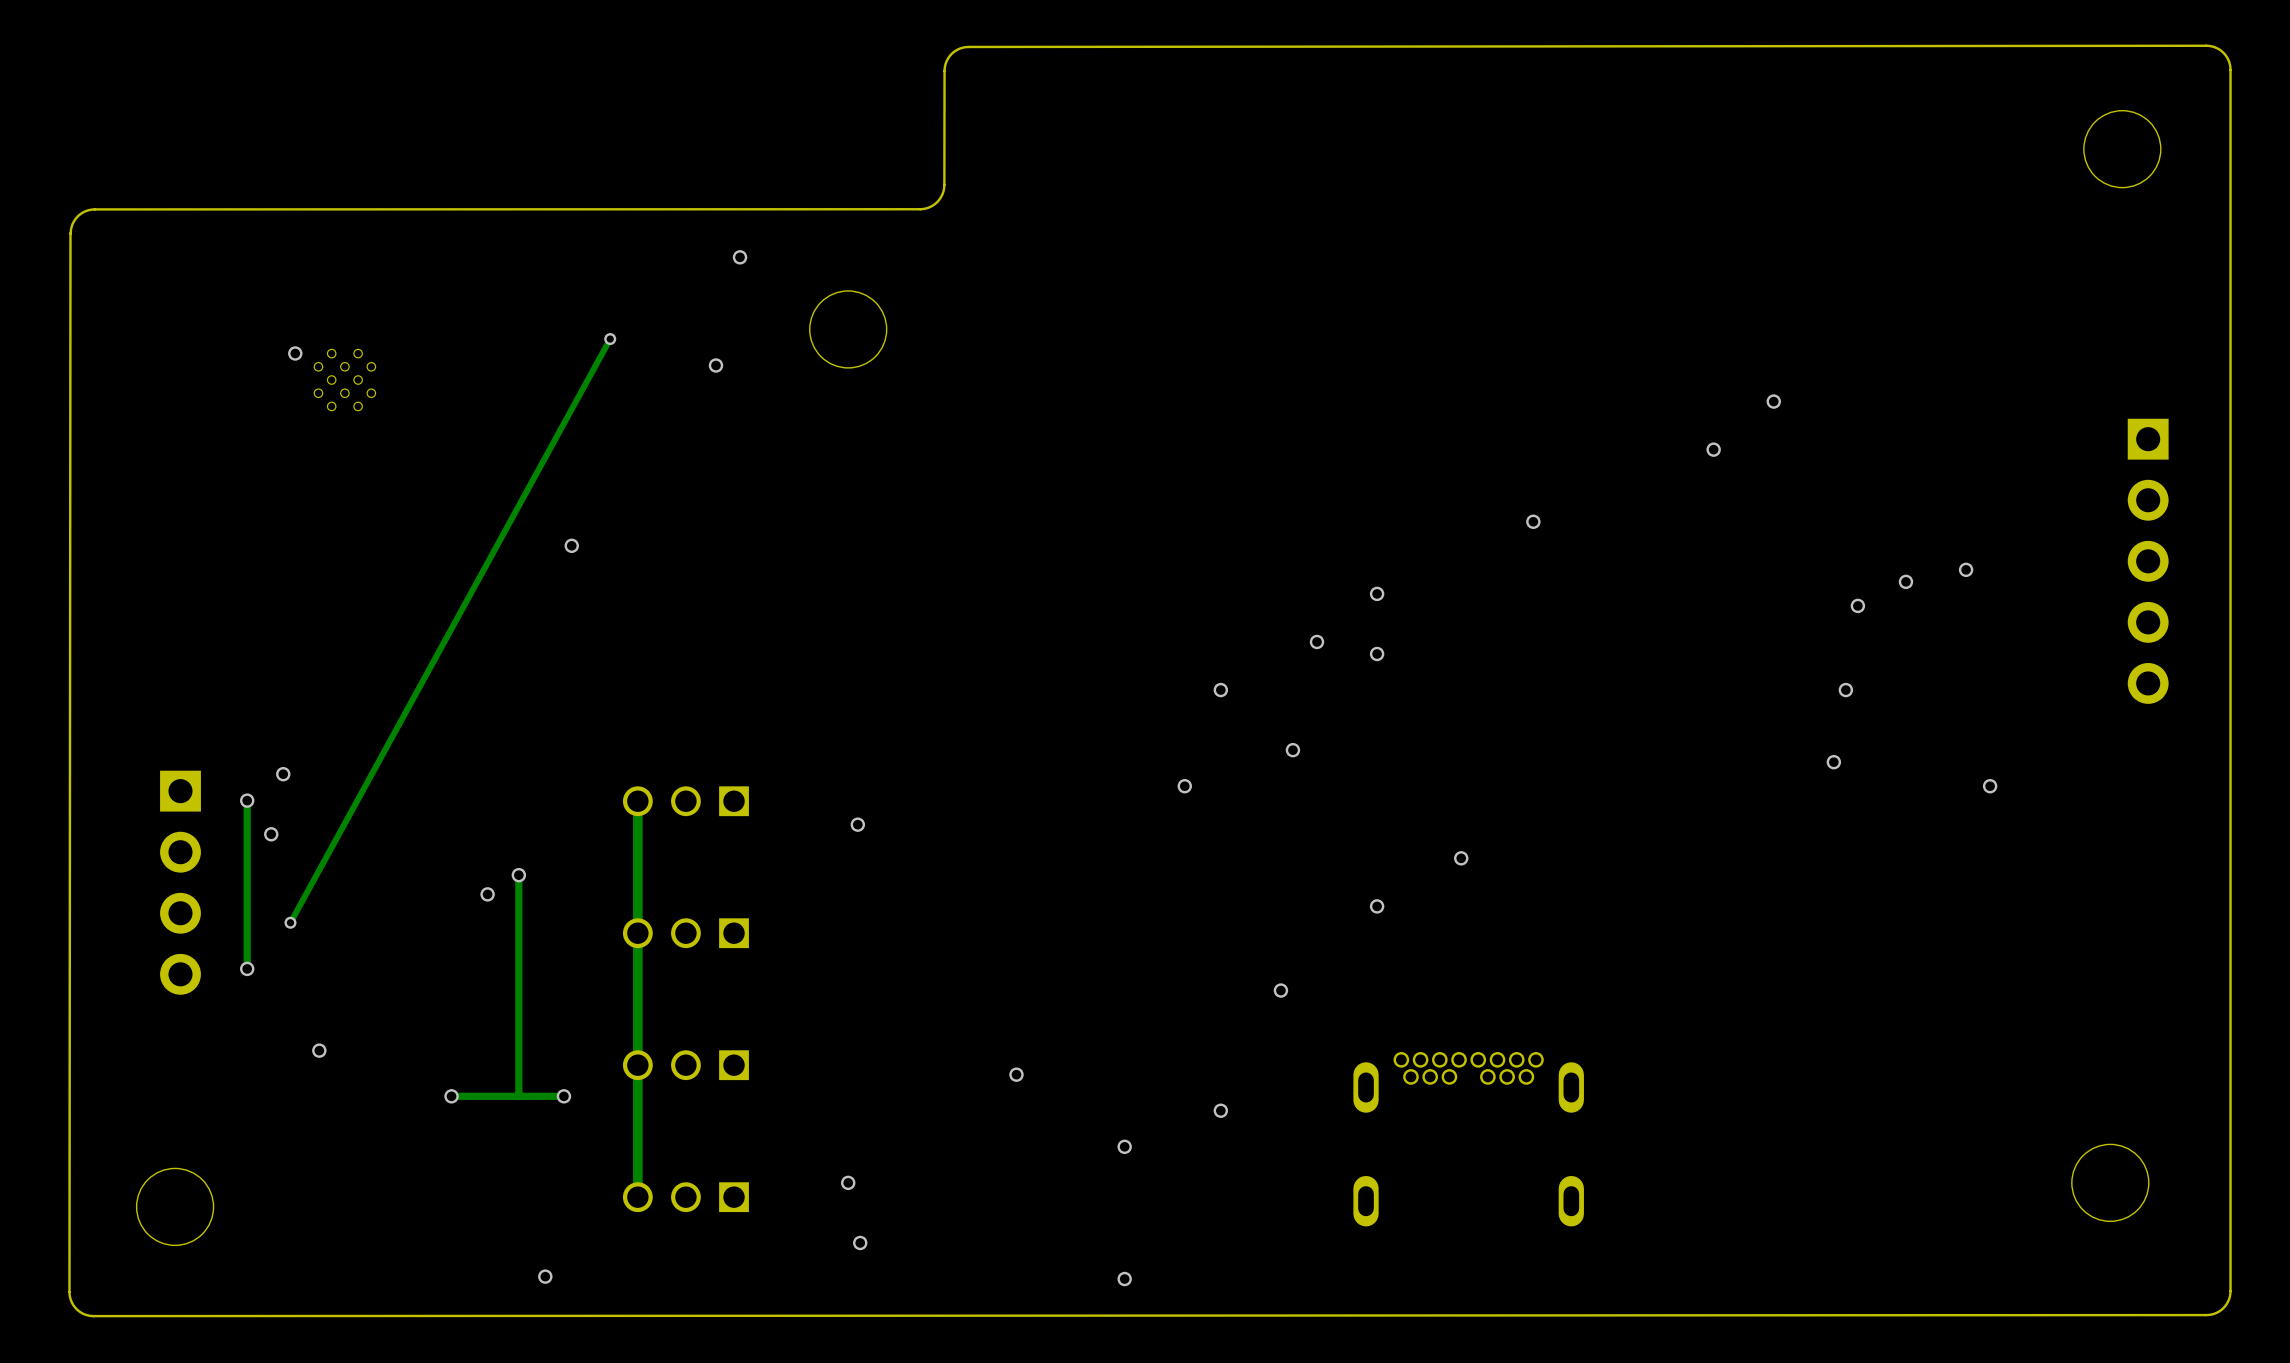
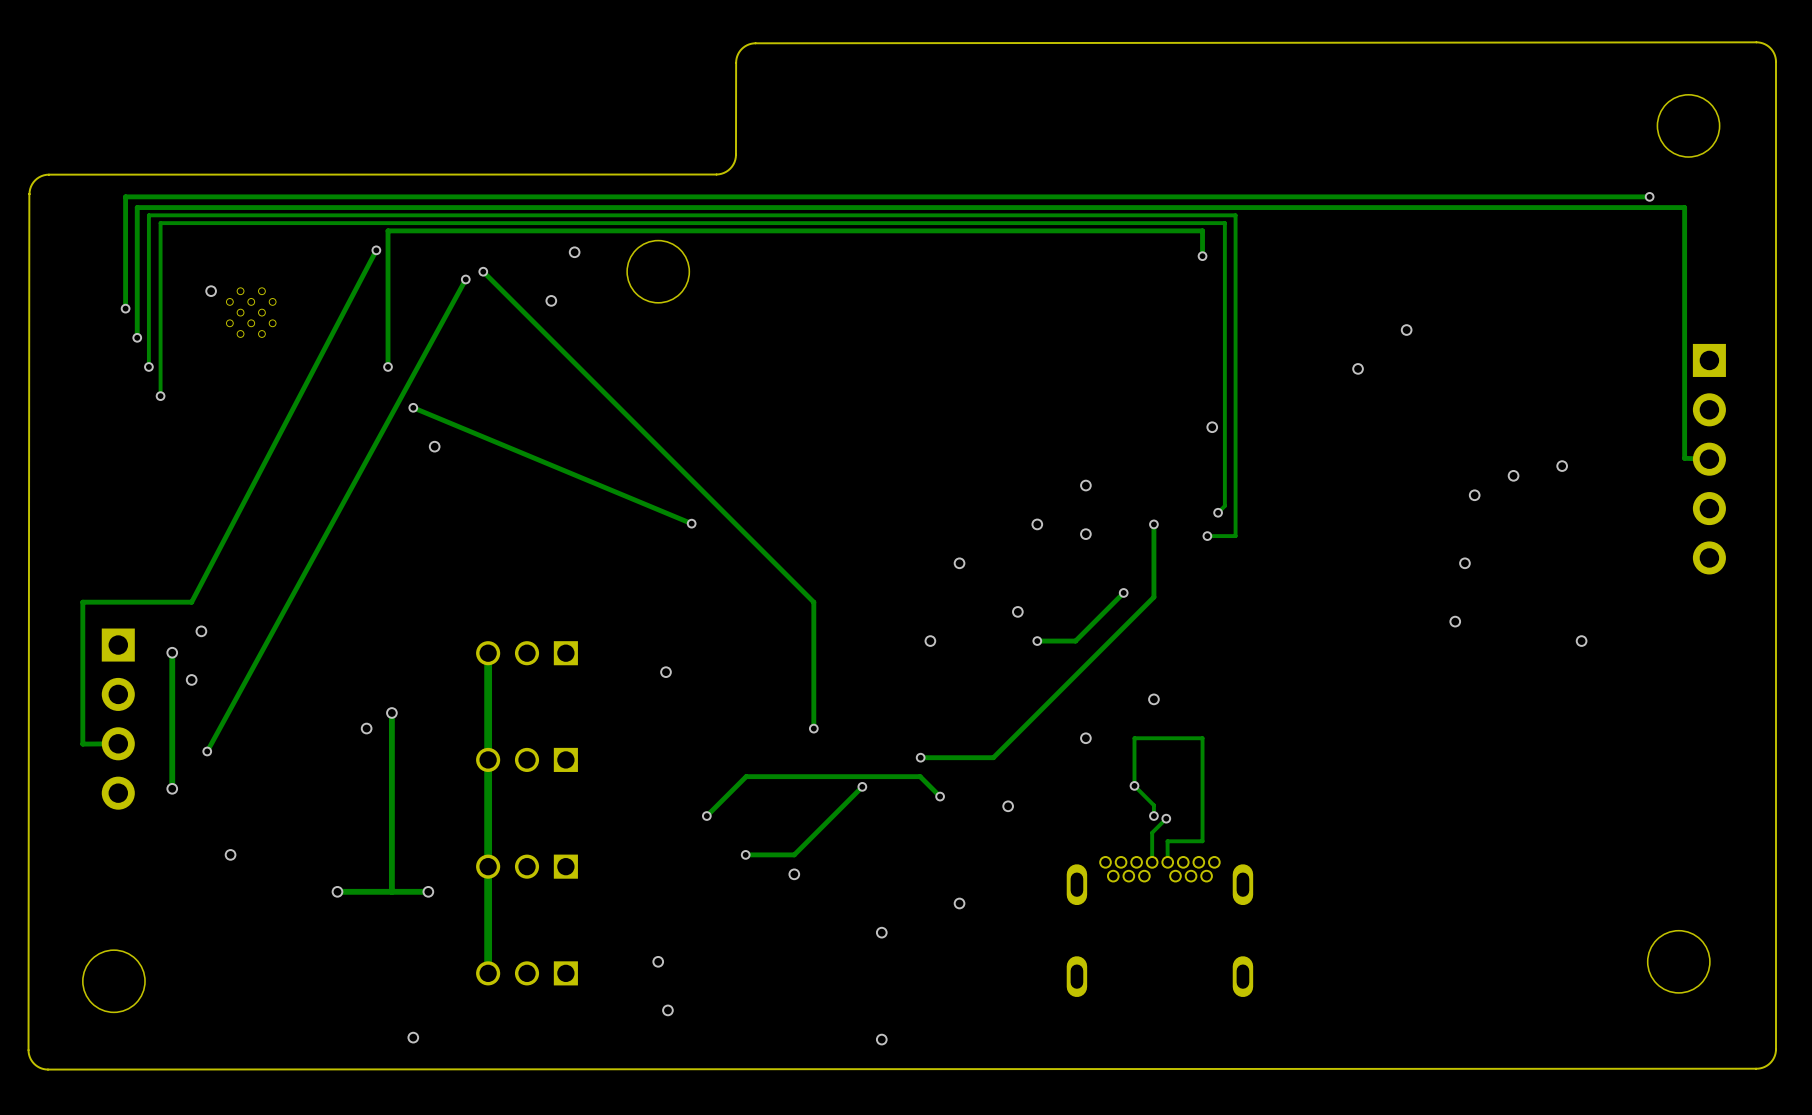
track: none -> (1649, 196) (125, 196) (125, 308)
via: none -> (1649, 196)
via position: (740, 257) -> (574, 252)
track: none -> (376, 250) (191, 602) (82, 602) (82, 744) (118, 743)
via: none -> (376, 250)
track: none -> (1202, 256) (1202, 230) (388, 230) (388, 366)
via: none -> (1202, 256)
track: none -> (483, 271) (813, 602) (813, 728)
via: none -> (483, 271)
via: none -> (125, 308)
track: none -> (137, 337) (137, 207) (1684, 207) (1684, 458) (1709, 459)
via: none -> (137, 337)
track: none -> (148, 366) (148, 215) (1235, 215) (1235, 536) (1207, 536)
via: none -> (148, 366)
via: none -> (388, 366)
track: none -> (160, 396) (160, 223) (1224, 223) (1224, 505) (1218, 512)
via: none -> (160, 396)
track: none -> (413, 407) (691, 523)
via: none -> (413, 407)
via: none -> (1218, 512)
via: none -> (691, 523)
track: none -> (1153, 524) (1153, 597) (993, 757) (920, 757)
via: none -> (1153, 524)
via: none -> (1207, 536)
track: none -> (1123, 592) (1075, 641) (1037, 641)
via: none -> (1123, 592)
via: none -> (1037, 641)
via: none -> (813, 728)
via: none -> (920, 757)
via: none -> (1134, 785)
track: none -> (862, 786) (794, 854) (745, 854)
via: none -> (862, 786)
track: none -> (940, 796) (920, 776) (746, 776) (706, 816)
via: none -> (940, 796)
via: none -> (706, 816)
track: none -> (1153, 816) (1153, 805) (1134, 785) (1134, 738) (1202, 738) (1202, 841) (1167, 841) (1167, 862)
via: none -> (1153, 816)
track: none -> (1166, 818) (1152, 832) (1152, 862)
via: none -> (1166, 818)
via: none -> (745, 854)

